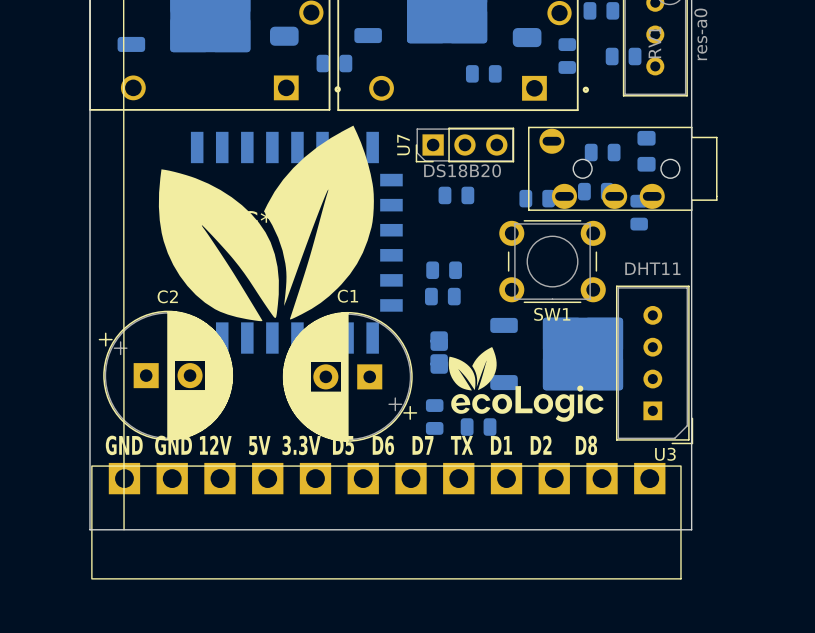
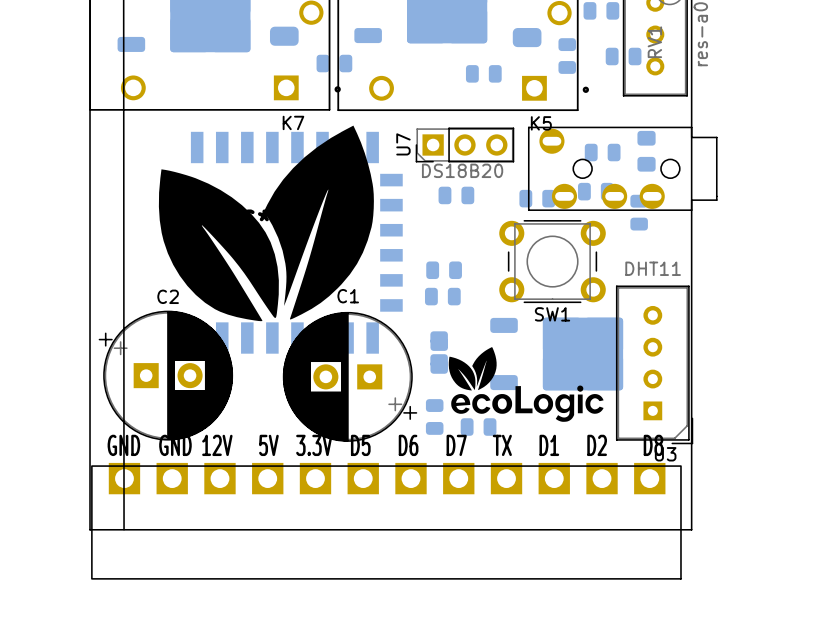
K7 name: none -> K7 (293, 122)
K5 name: none -> K5 (541, 123)

